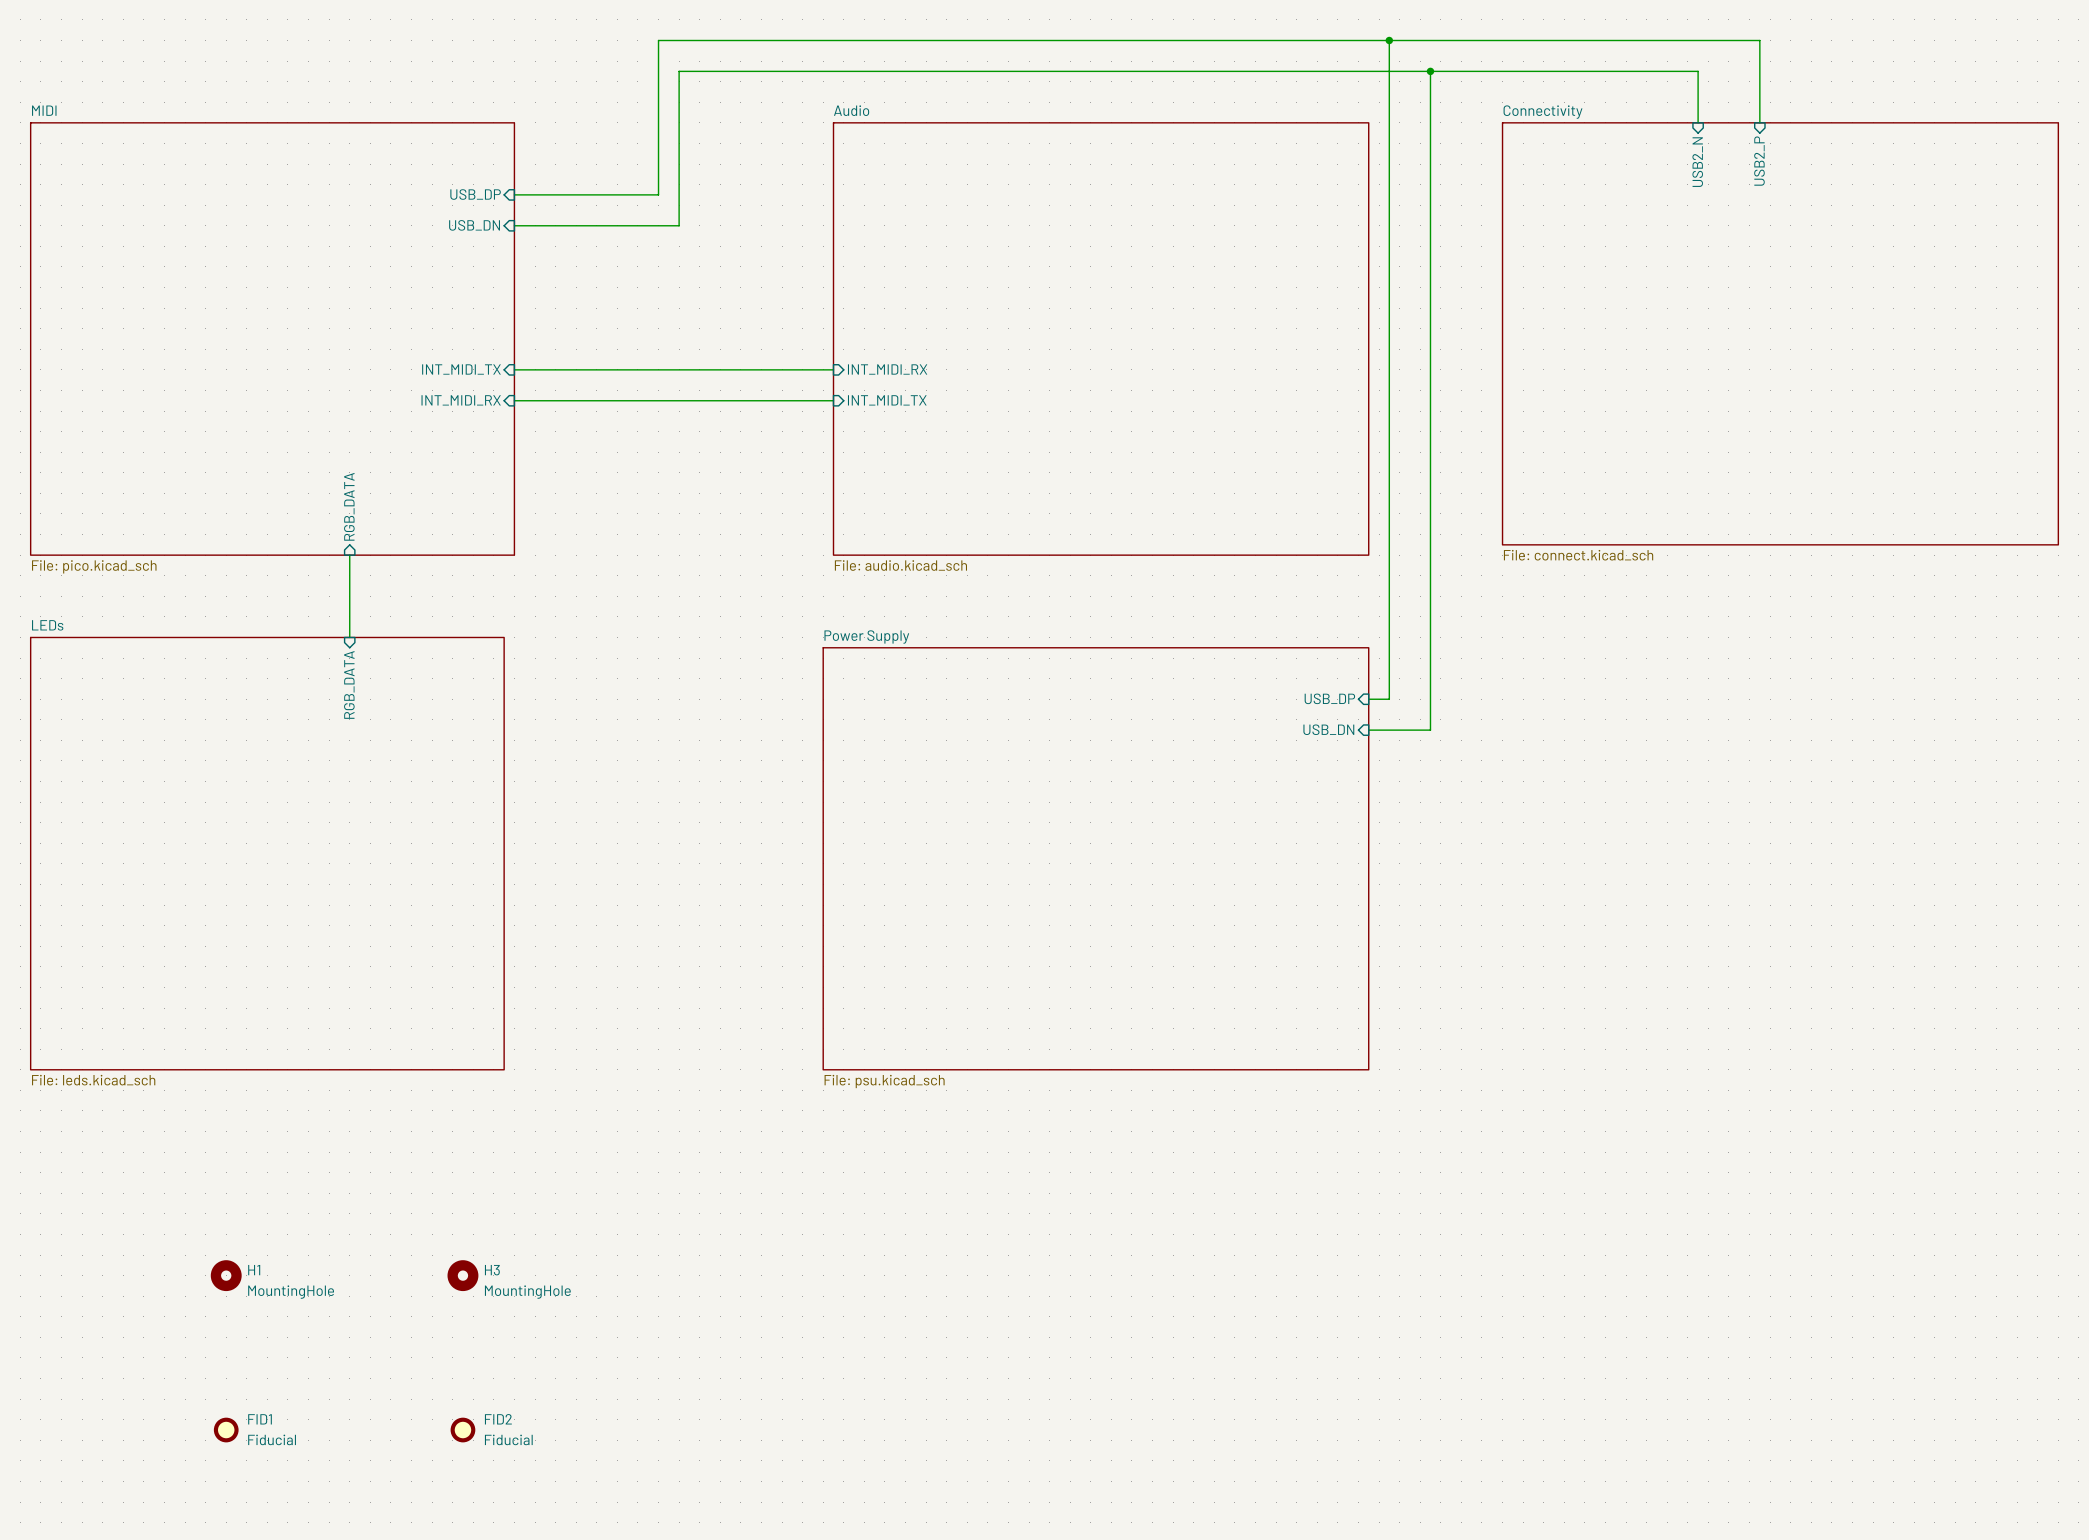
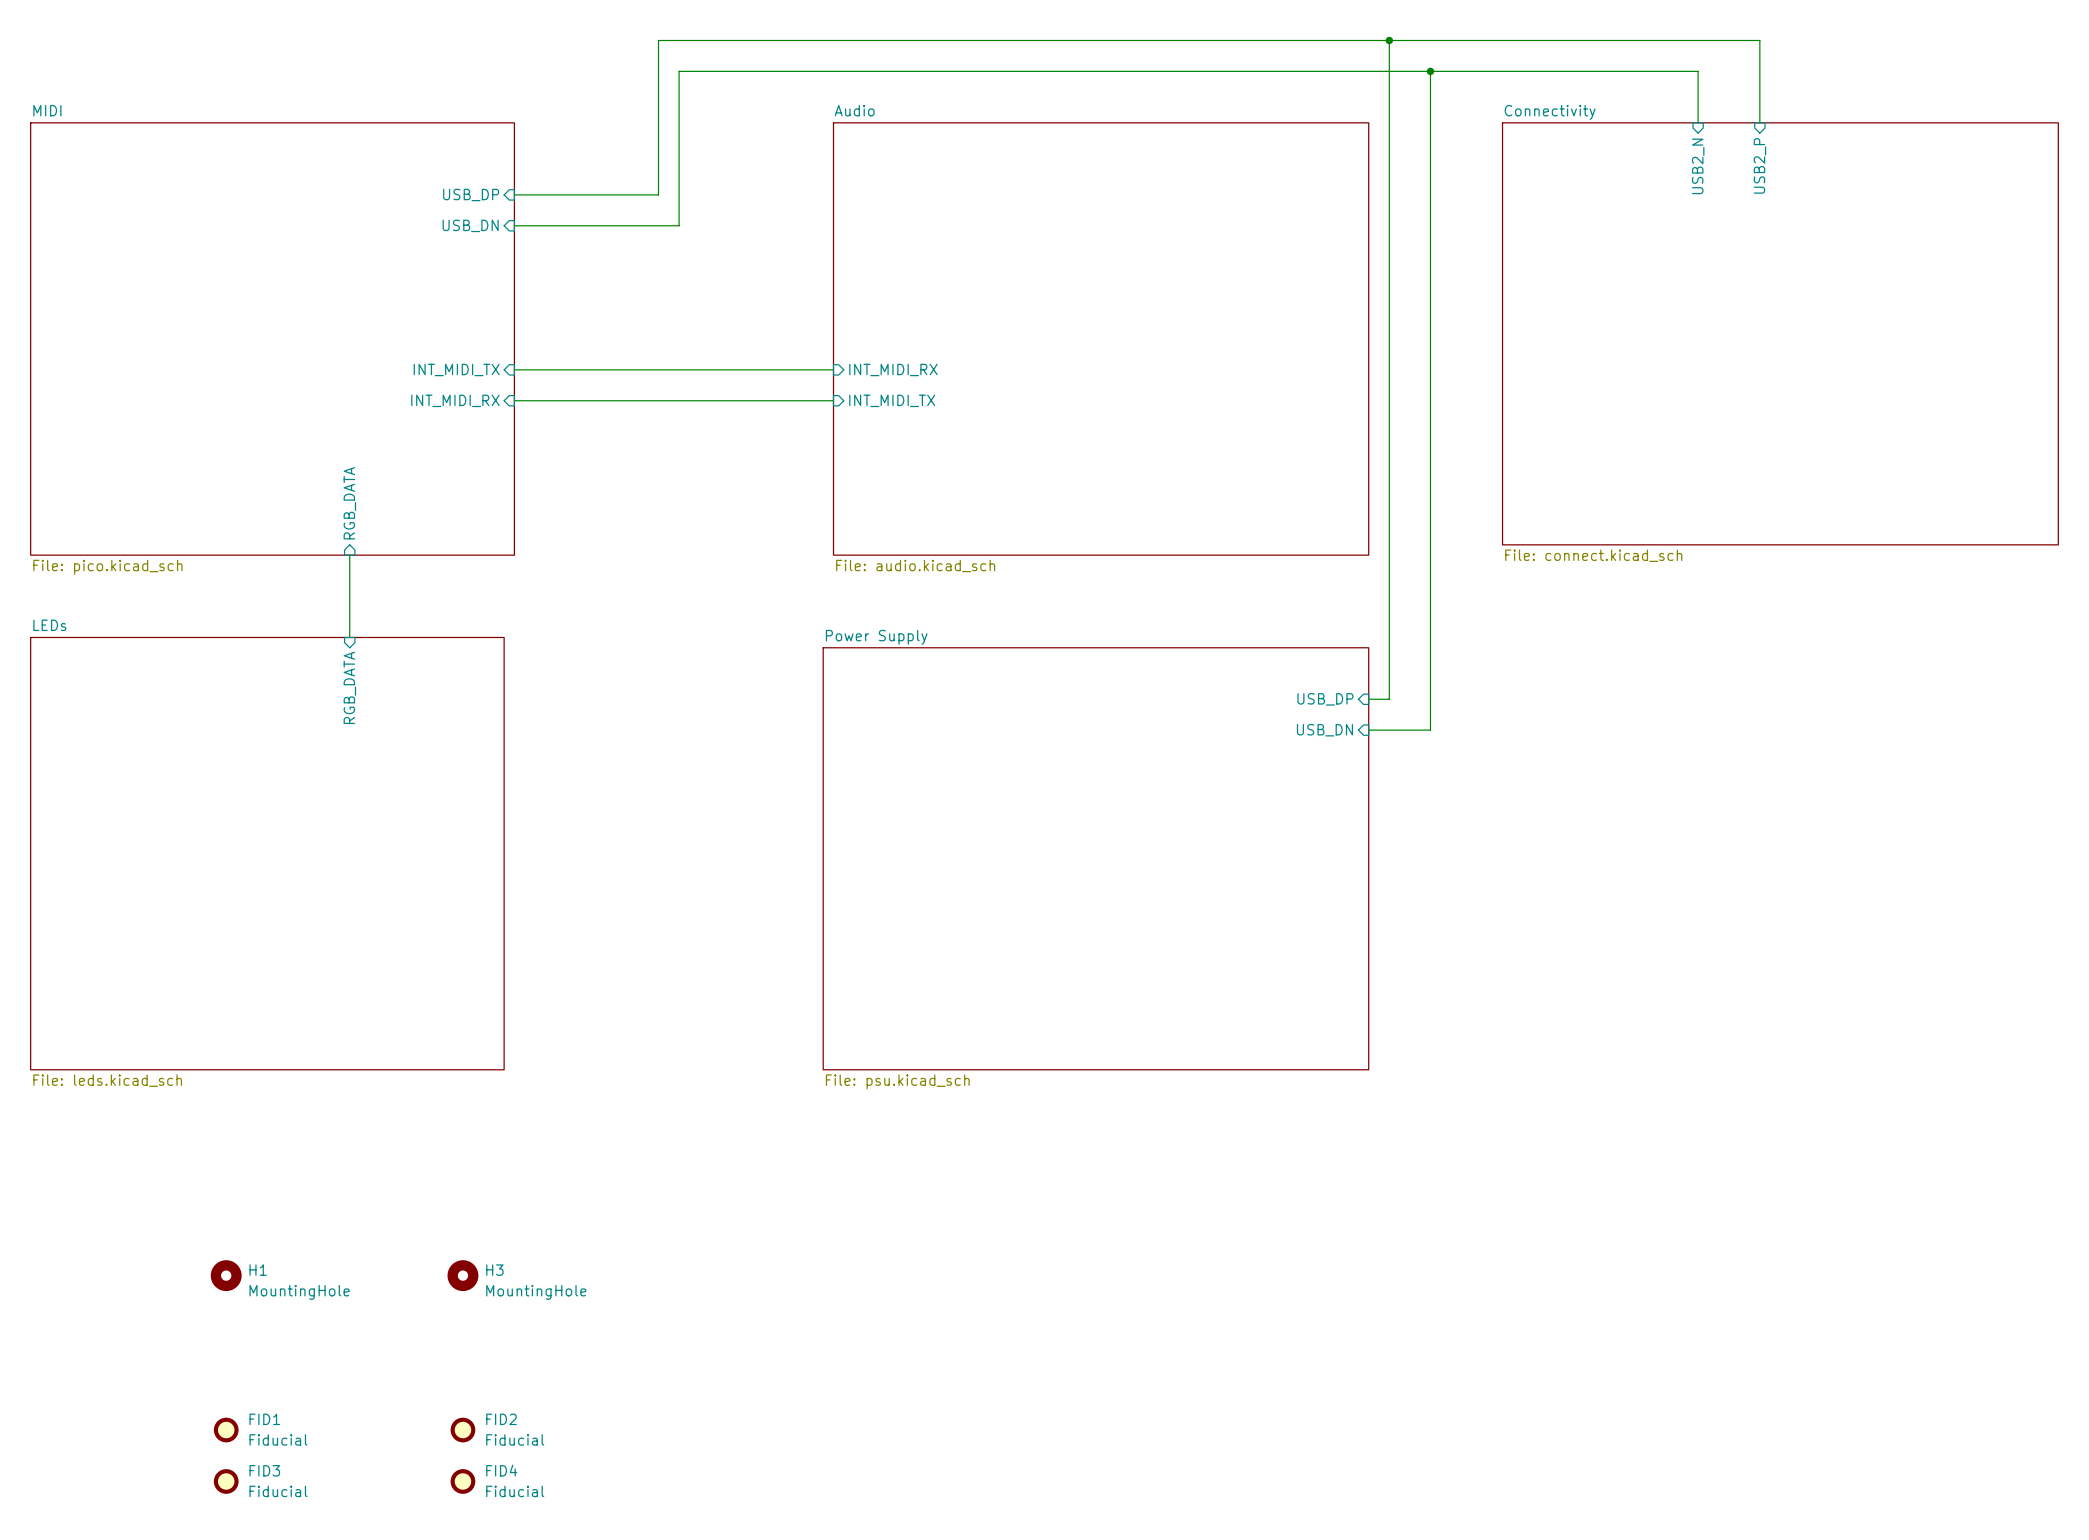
FID3: none -> Fiducial (226, 1481)
FID4: none -> Fiducial (462, 1481)

